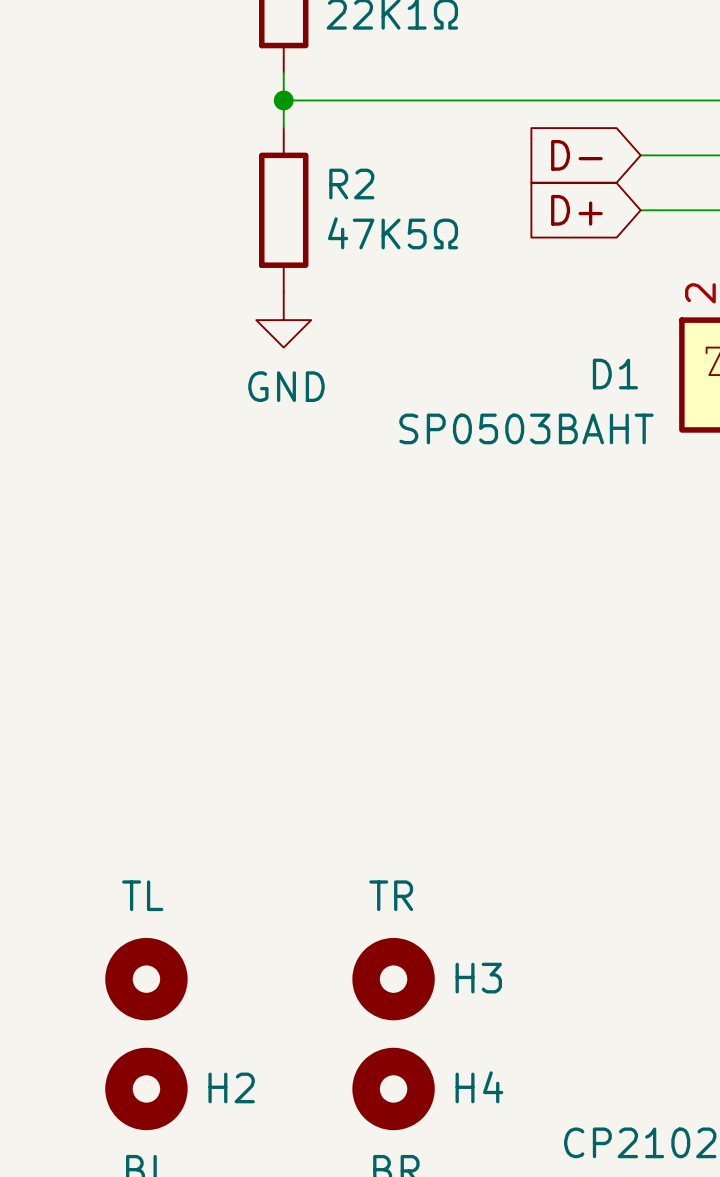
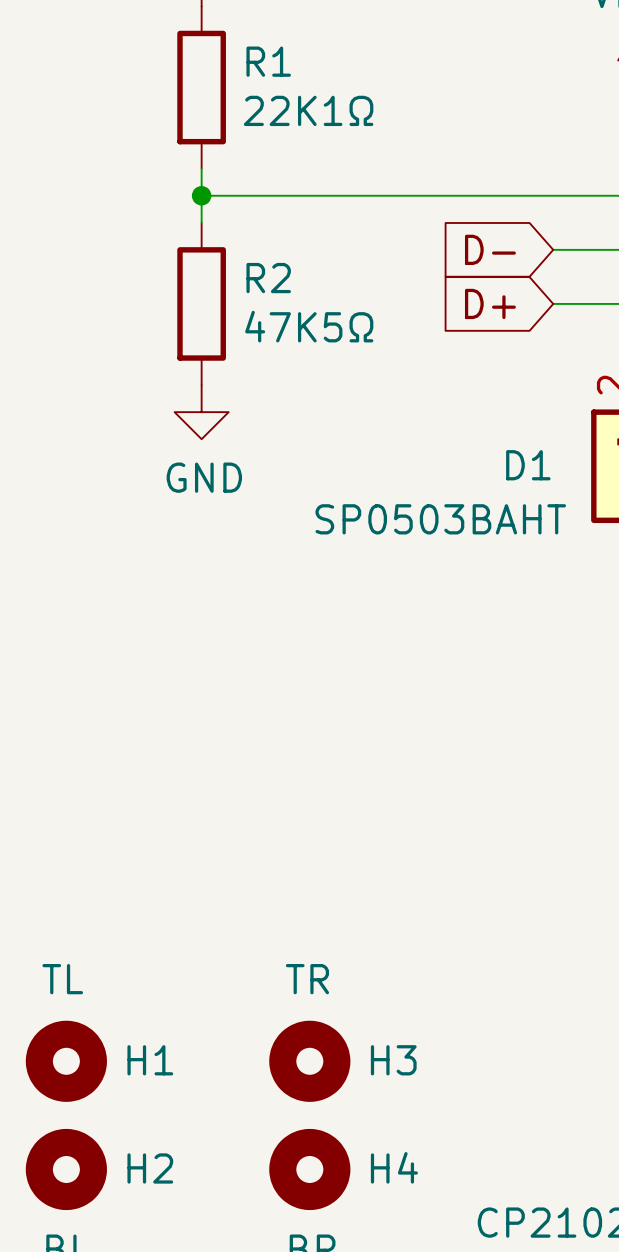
H1 name: none -> H1 (150, 1060)

